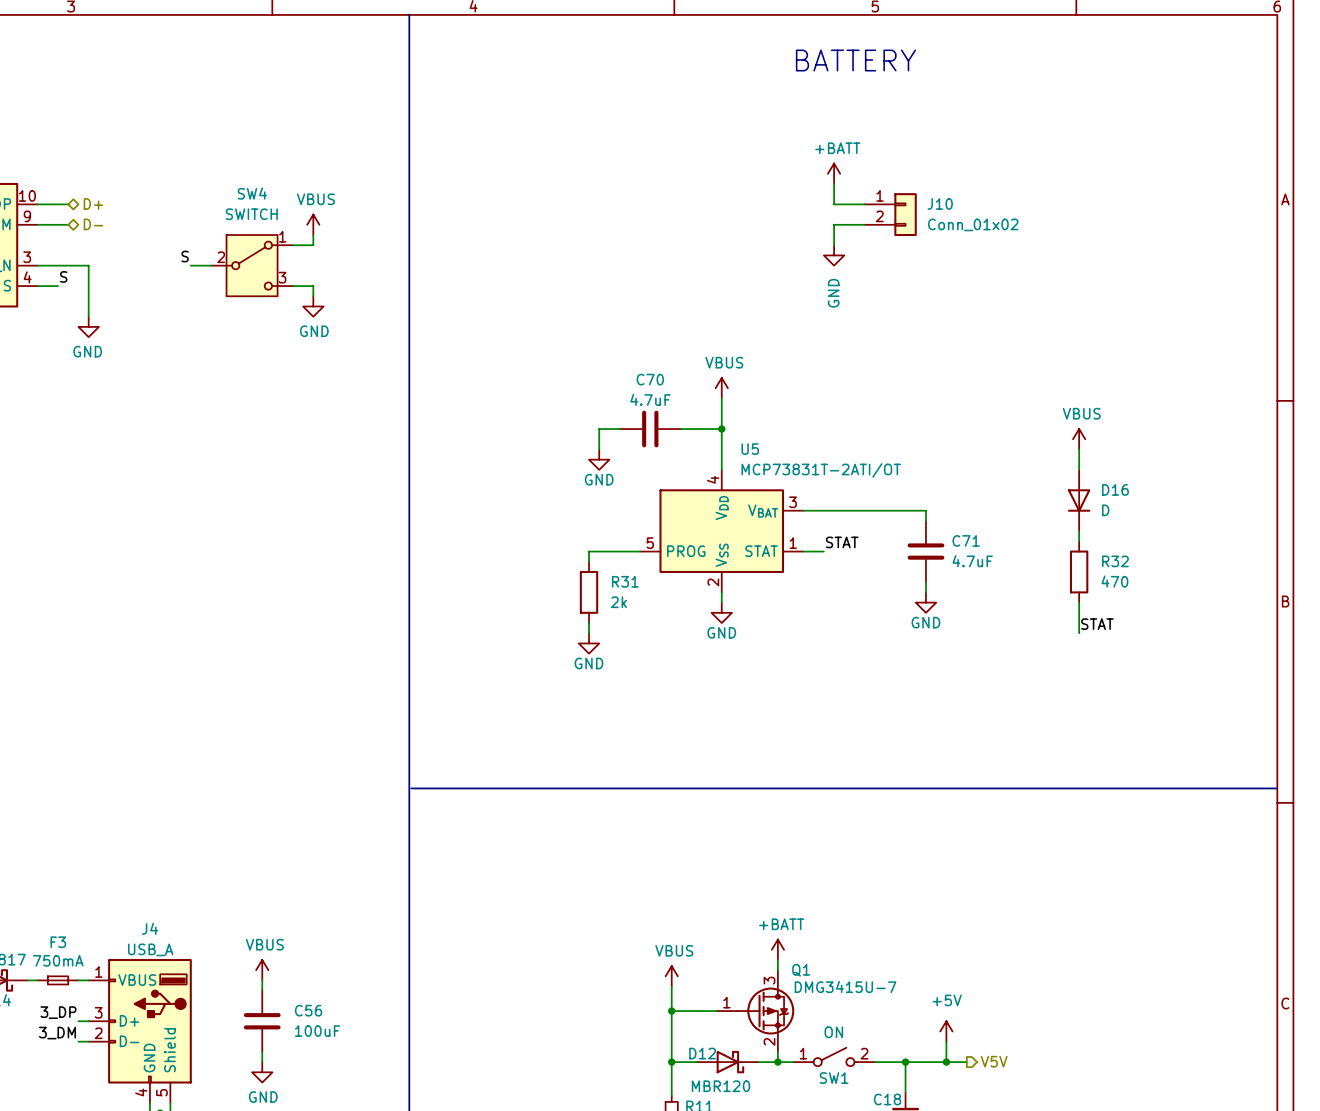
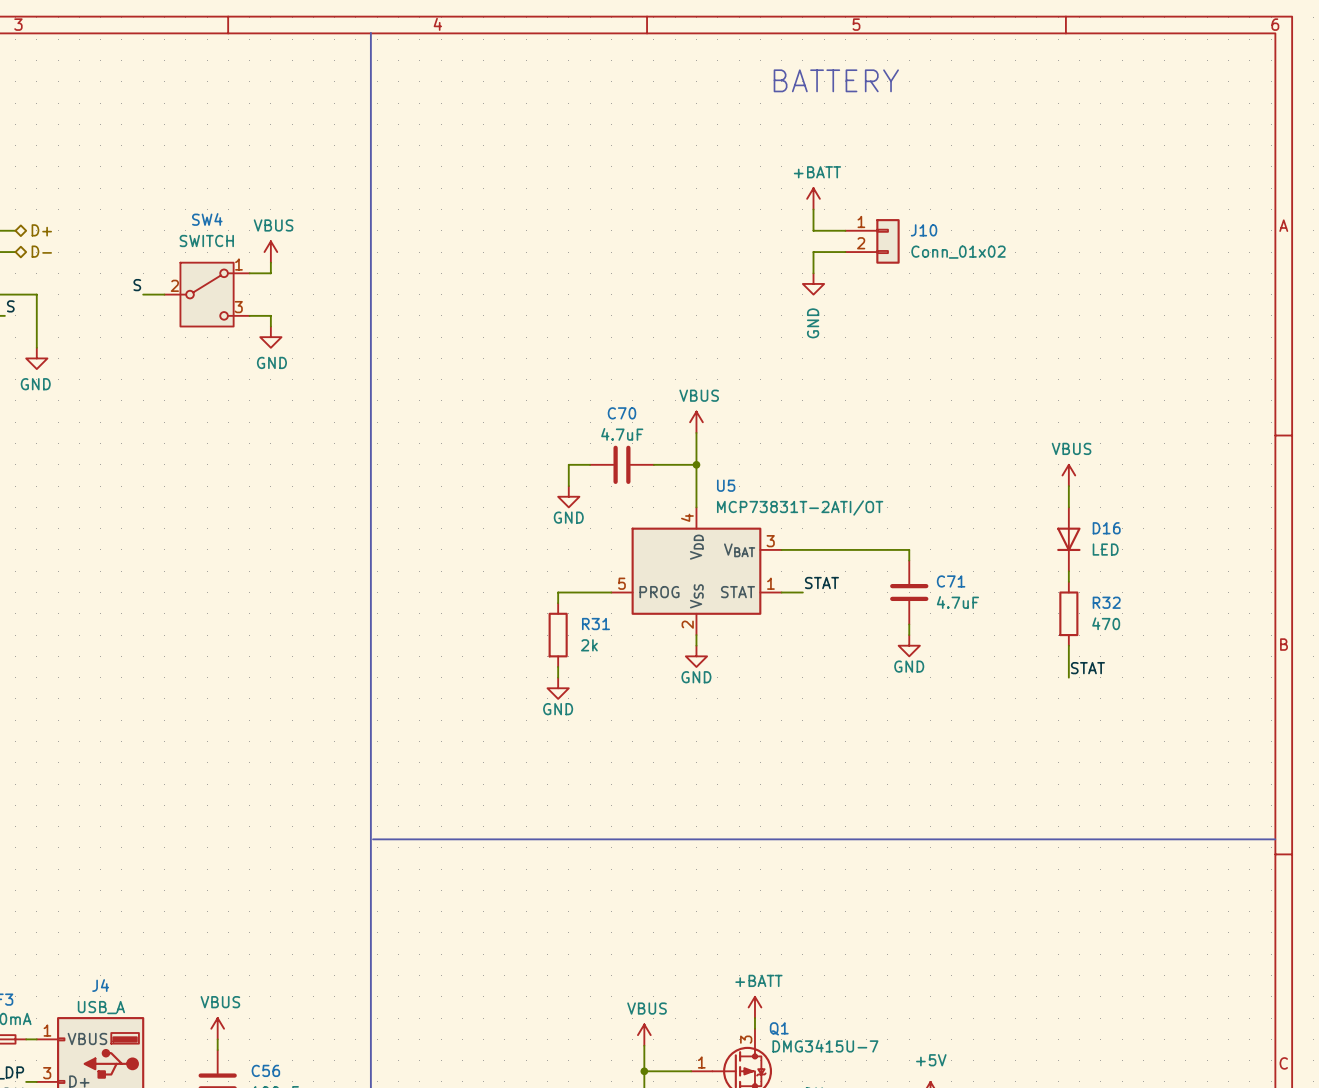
D16 value: D (1105, 510) -> LED (1105, 549)

